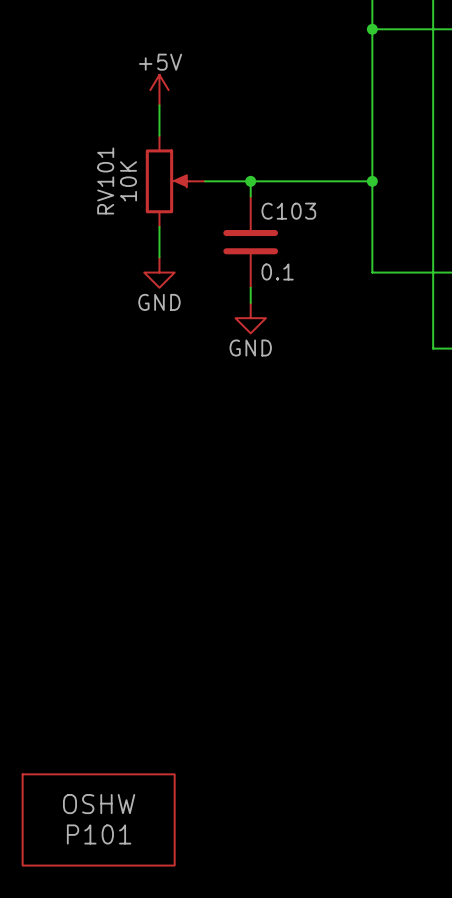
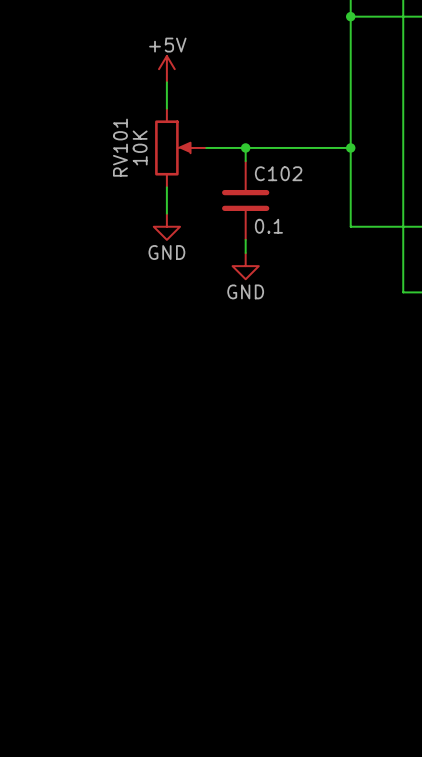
C103 name: C103 (288, 211) -> C102 (278, 173)
P101: OSHW (98, 819) -> none

